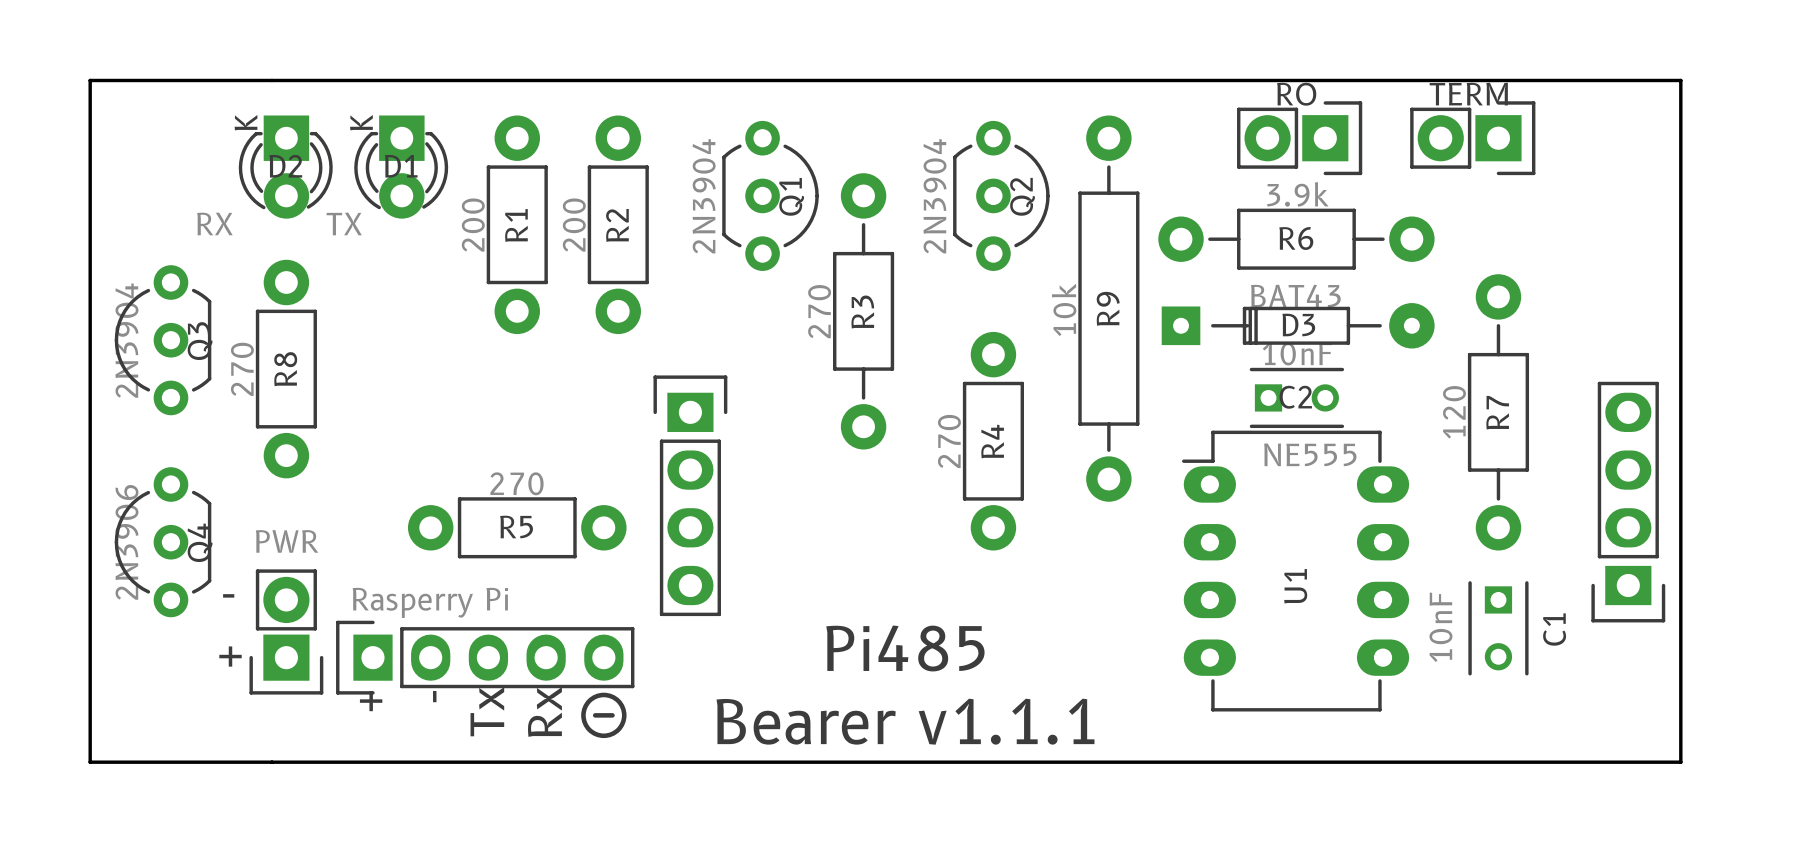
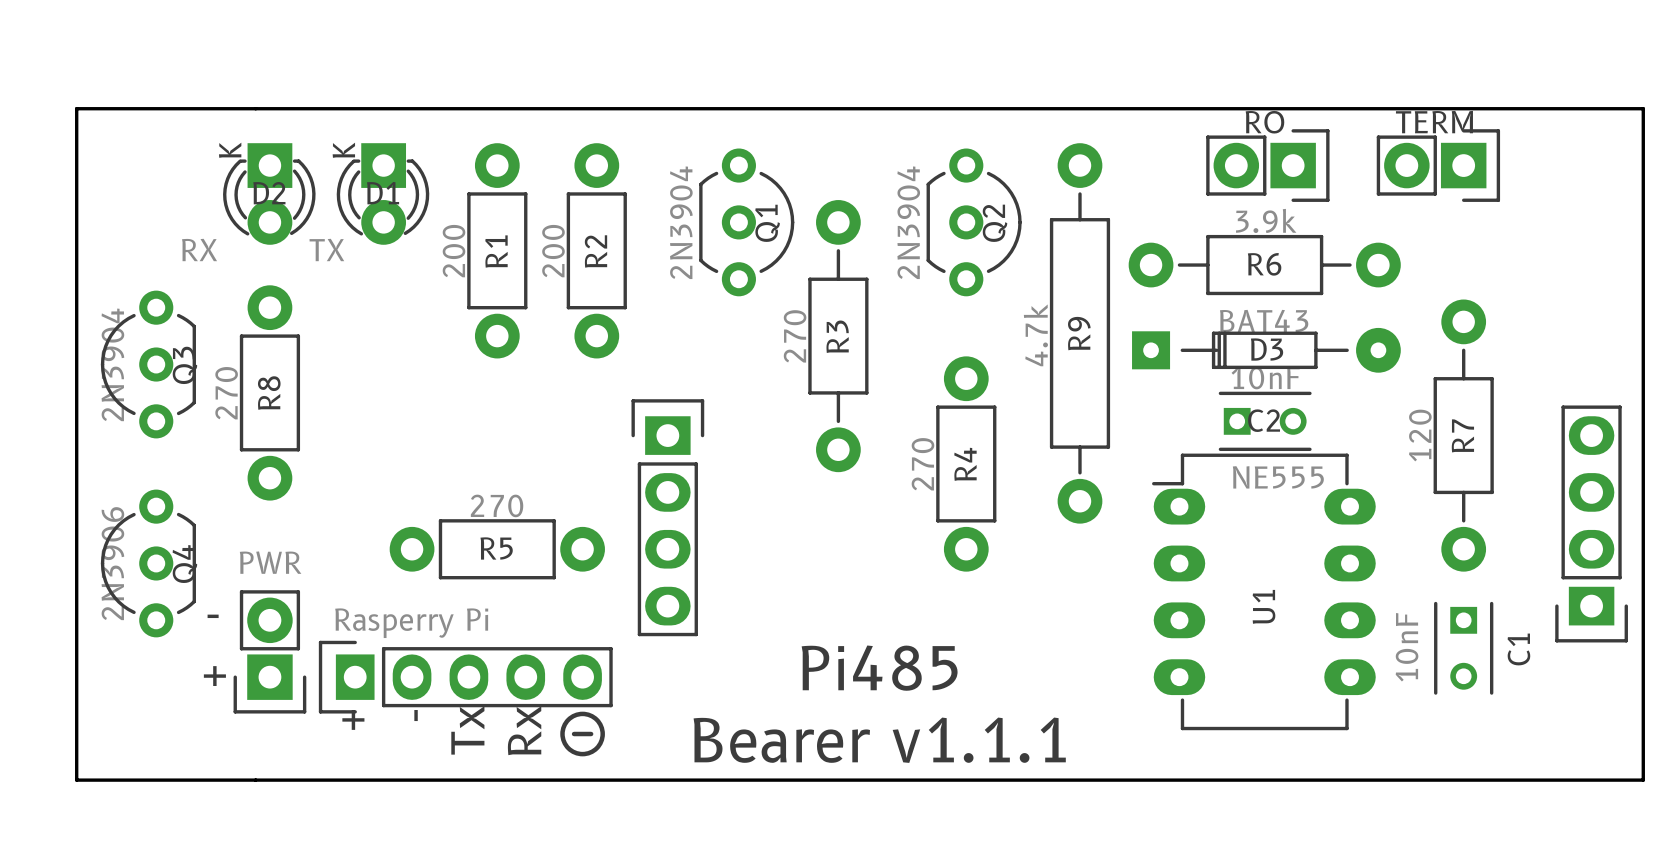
R9 value: 10k (1064, 309) -> 4.7k (1035, 335)

